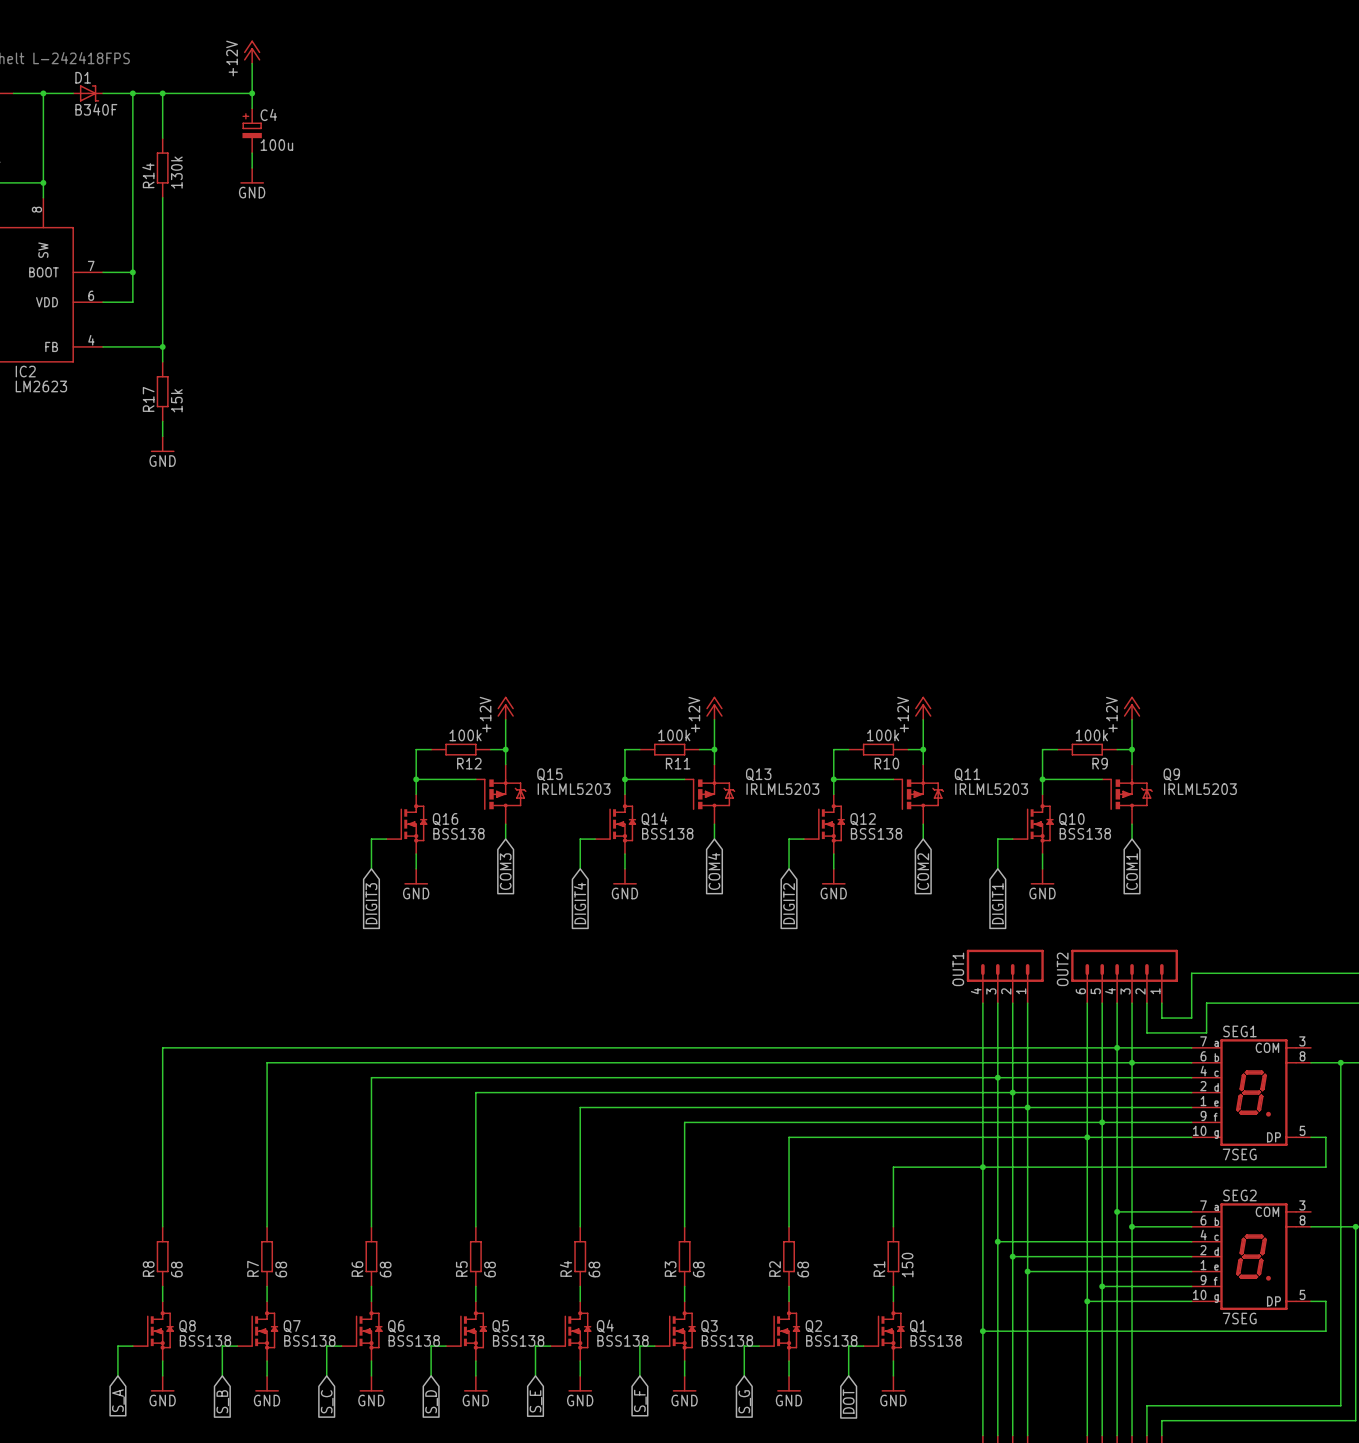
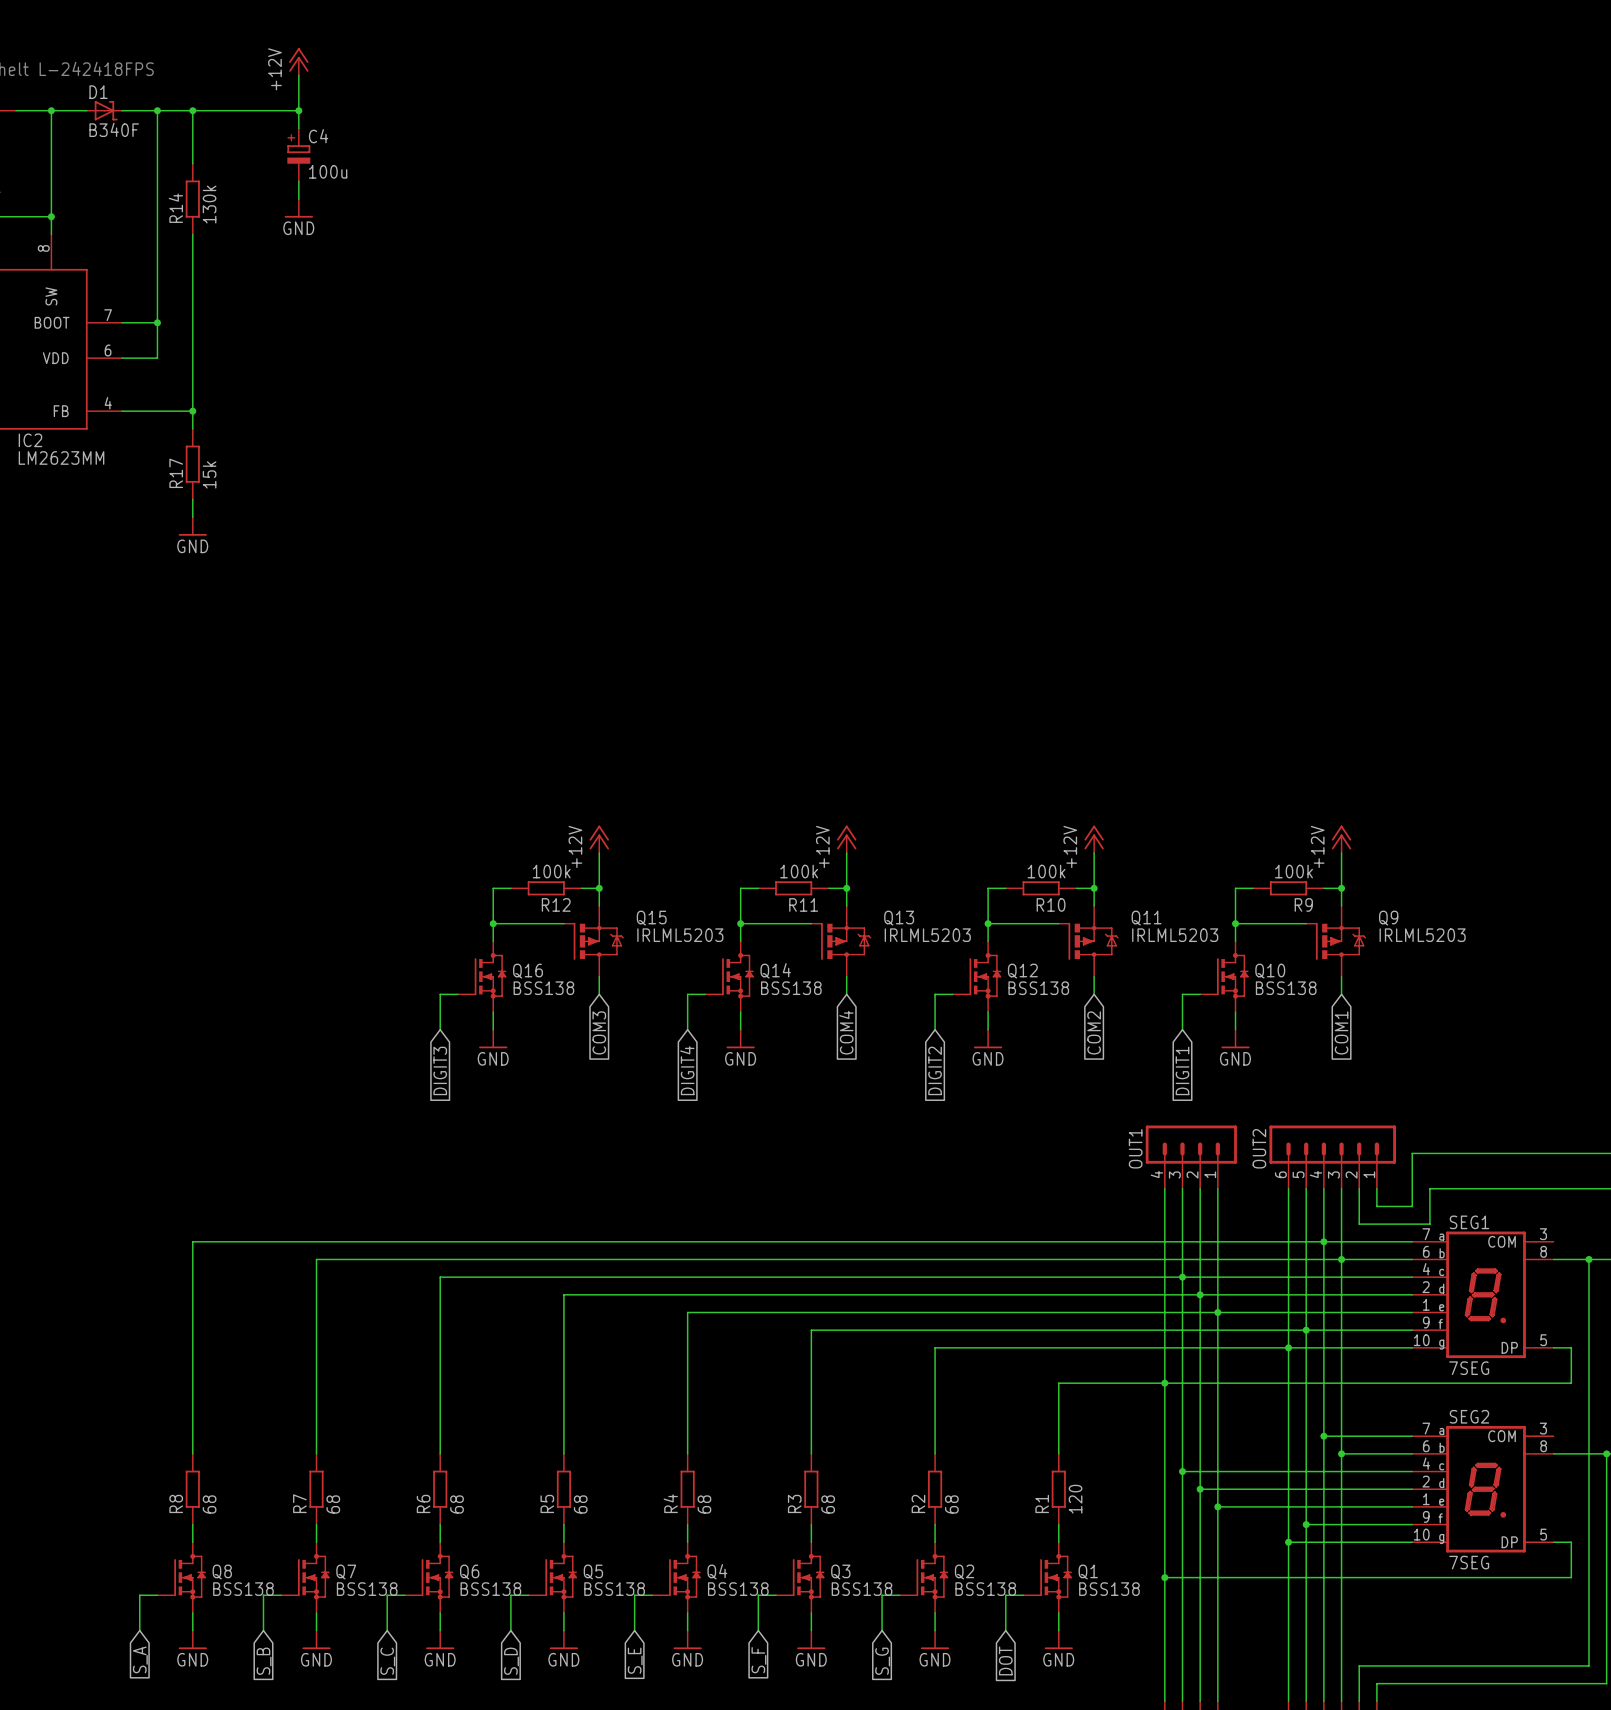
IC2 value: LM2623 (41, 386) -> LM2623MM (61, 457)
R1 value: 150 (907, 1265) -> 120 (1075, 1499)

